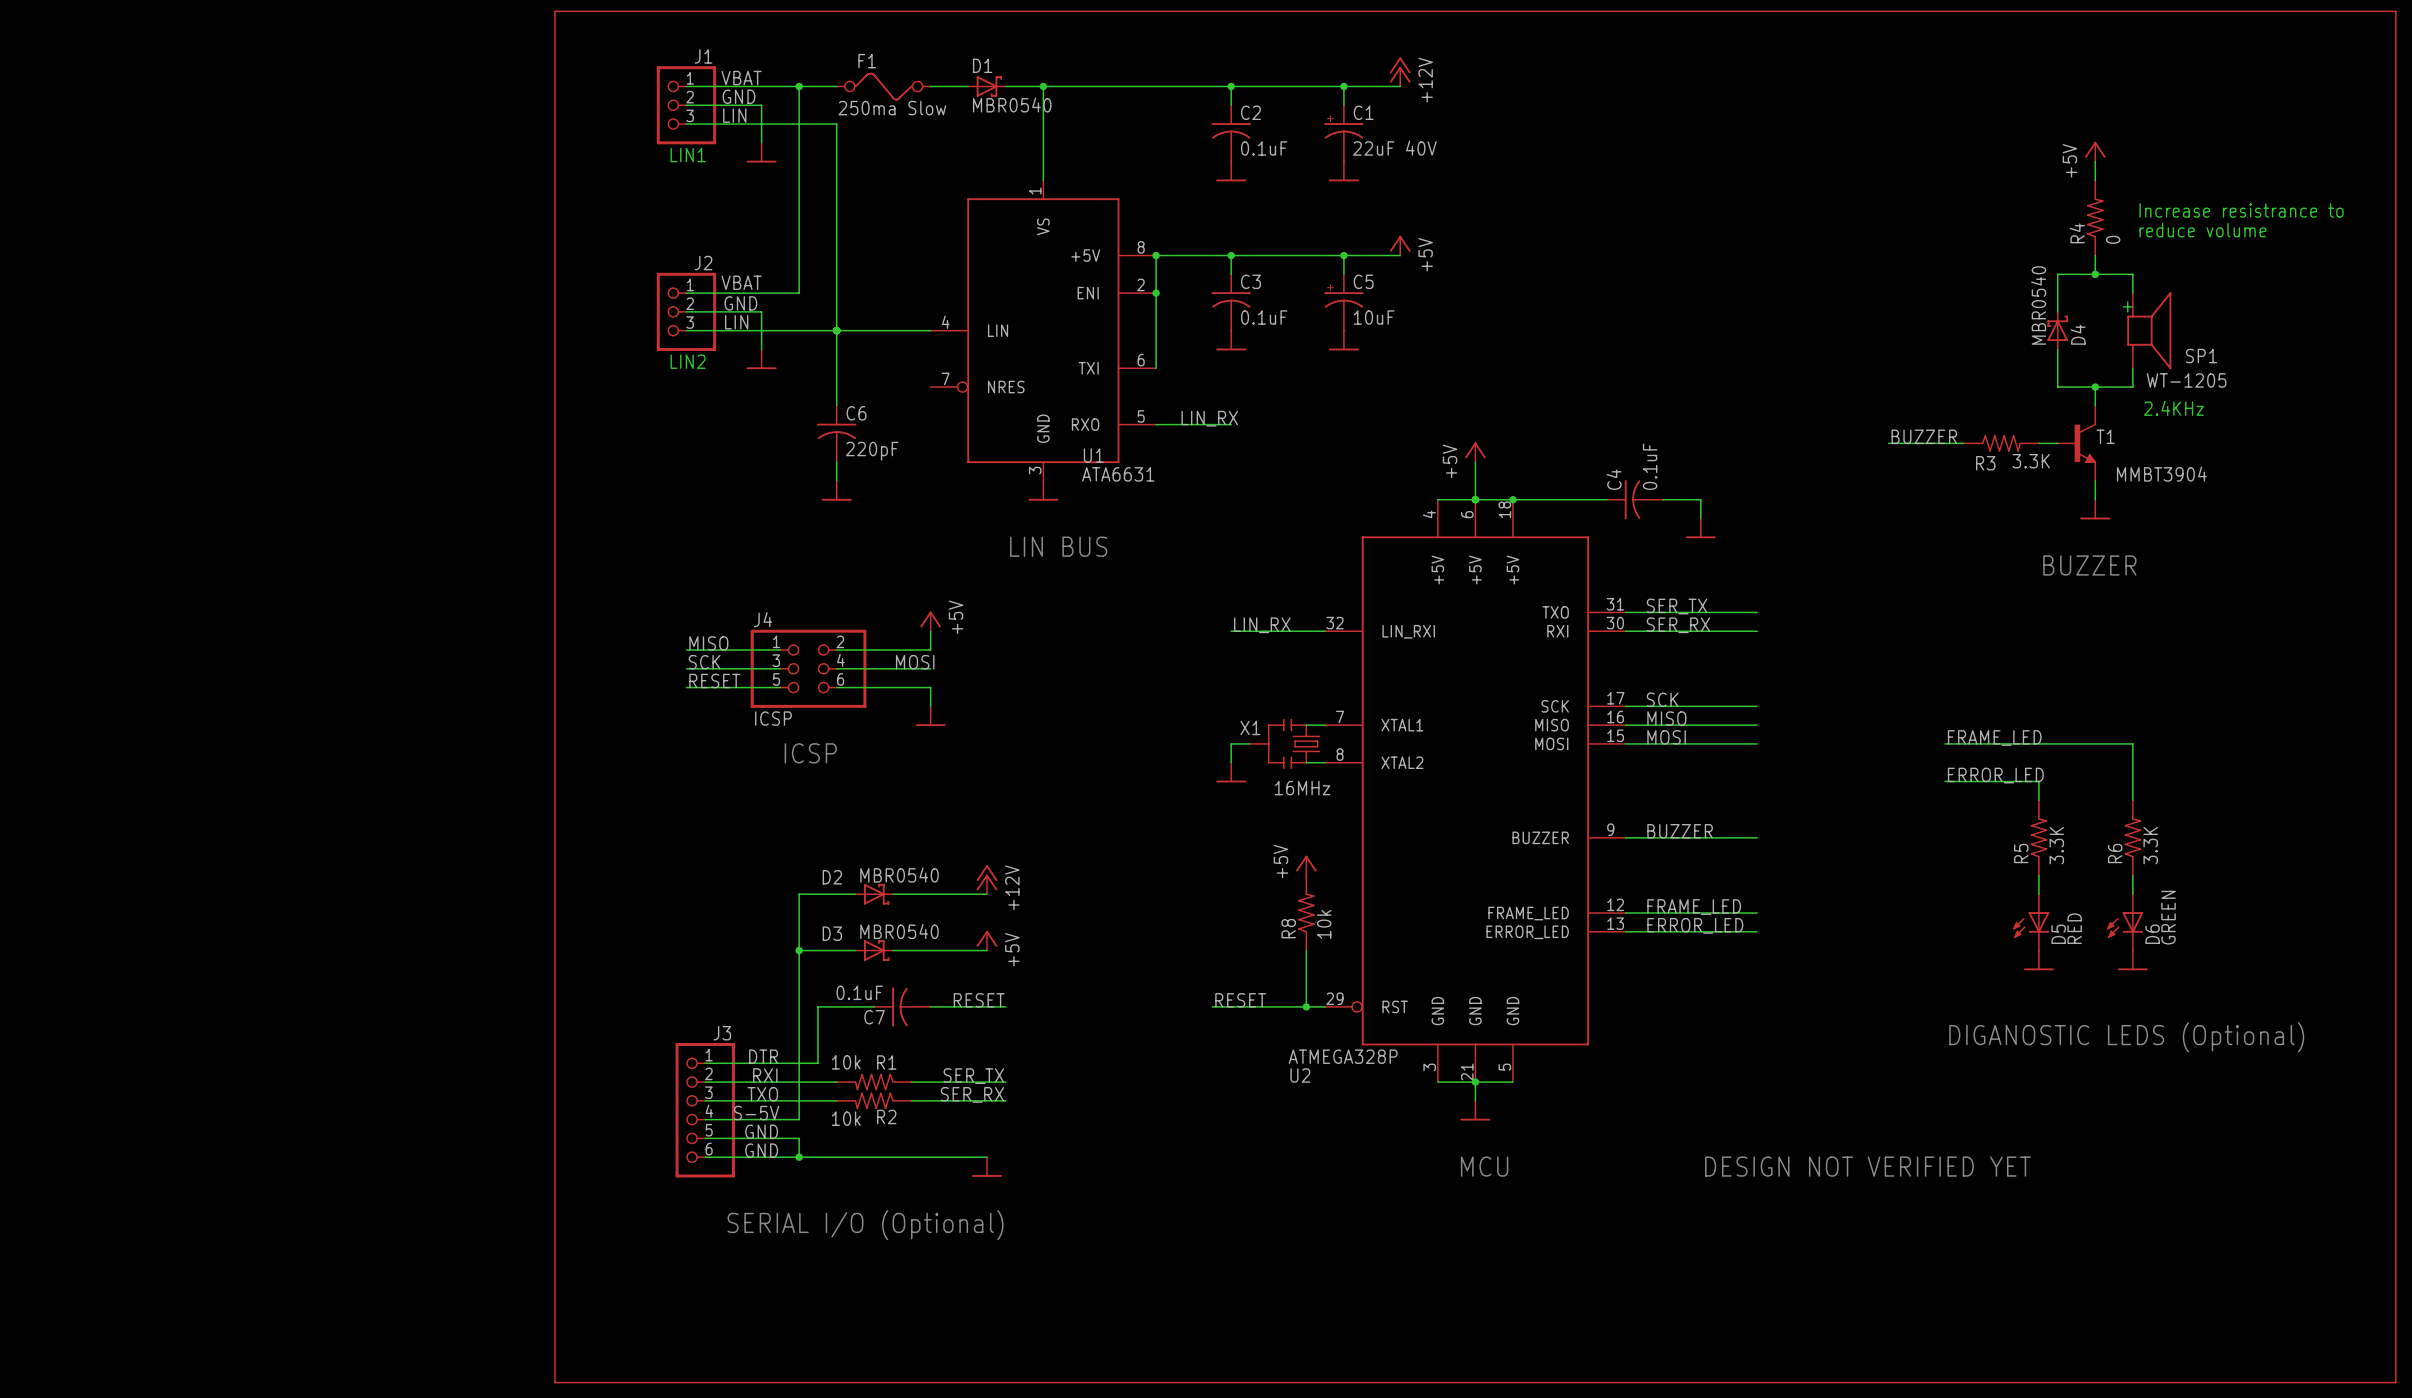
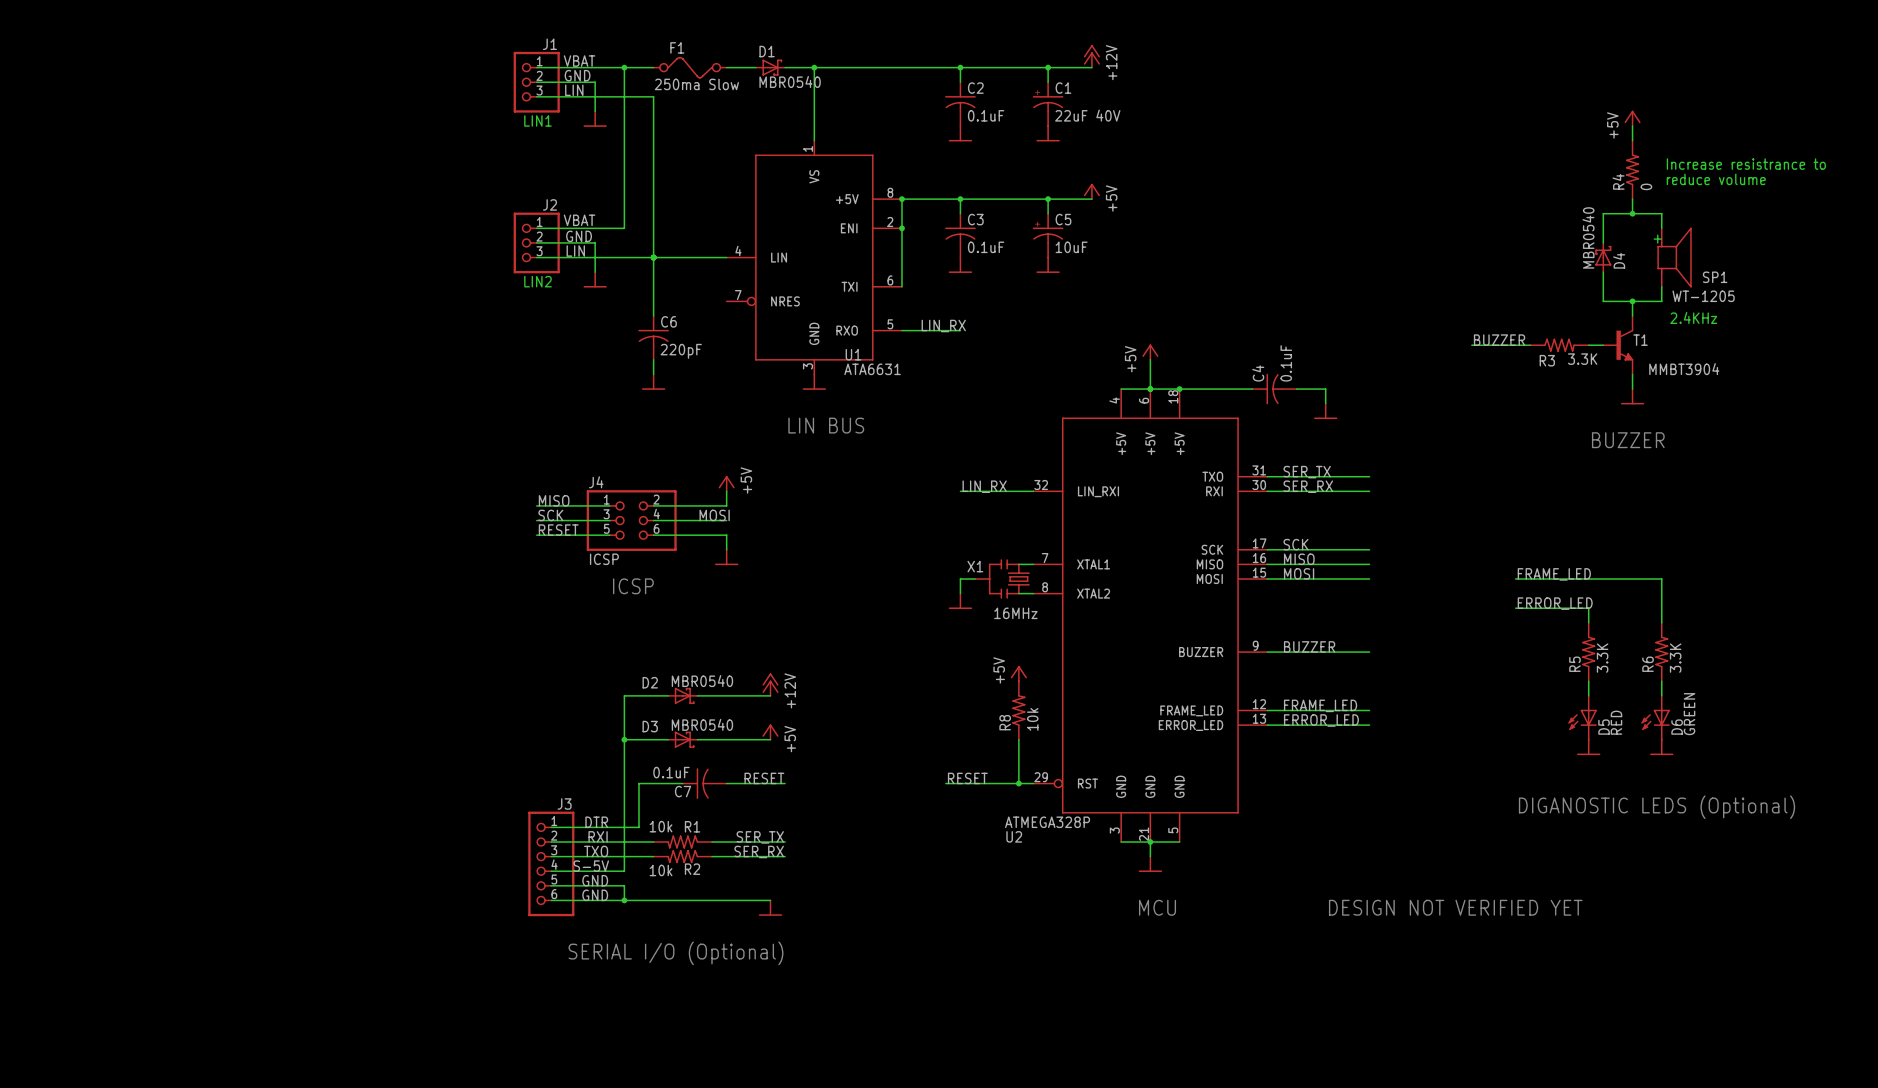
line: (554, 11) (2395, 11) (2395, 1382) (554, 1382) (554, 11) -> none

